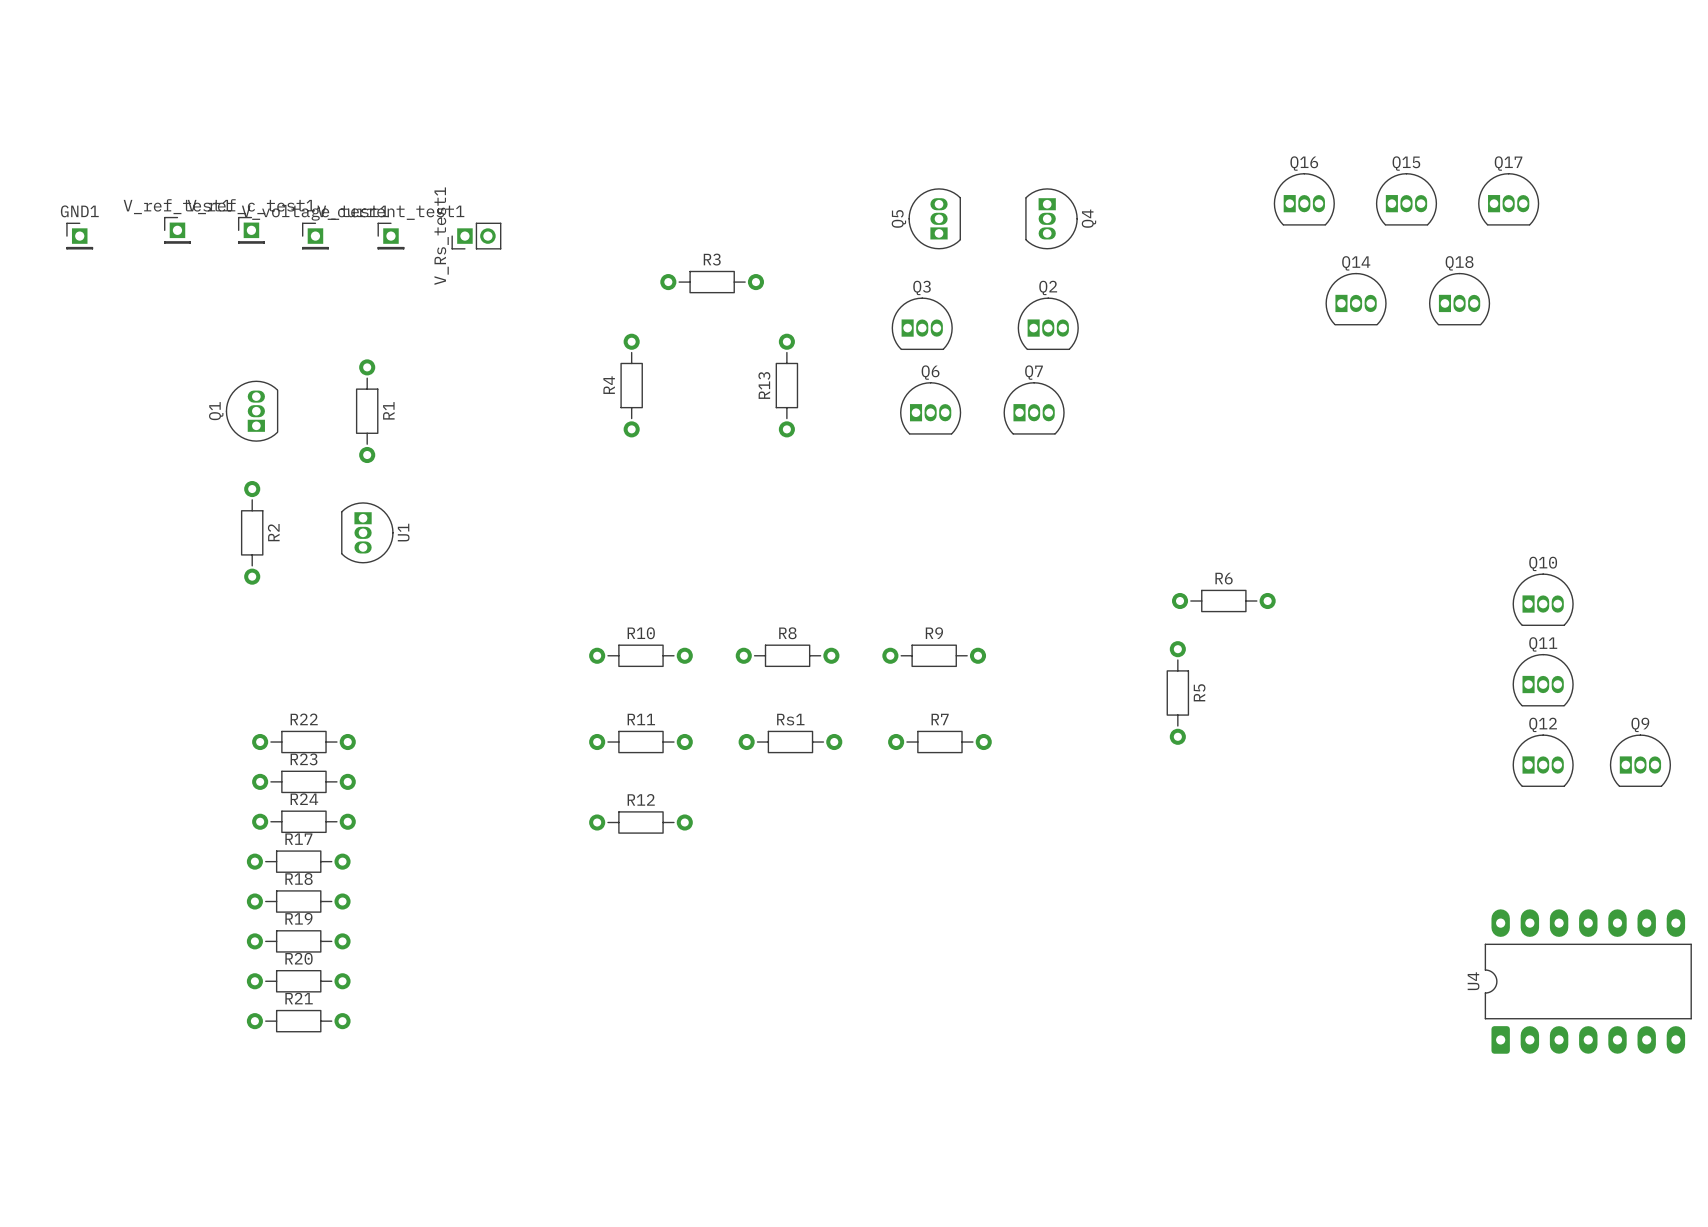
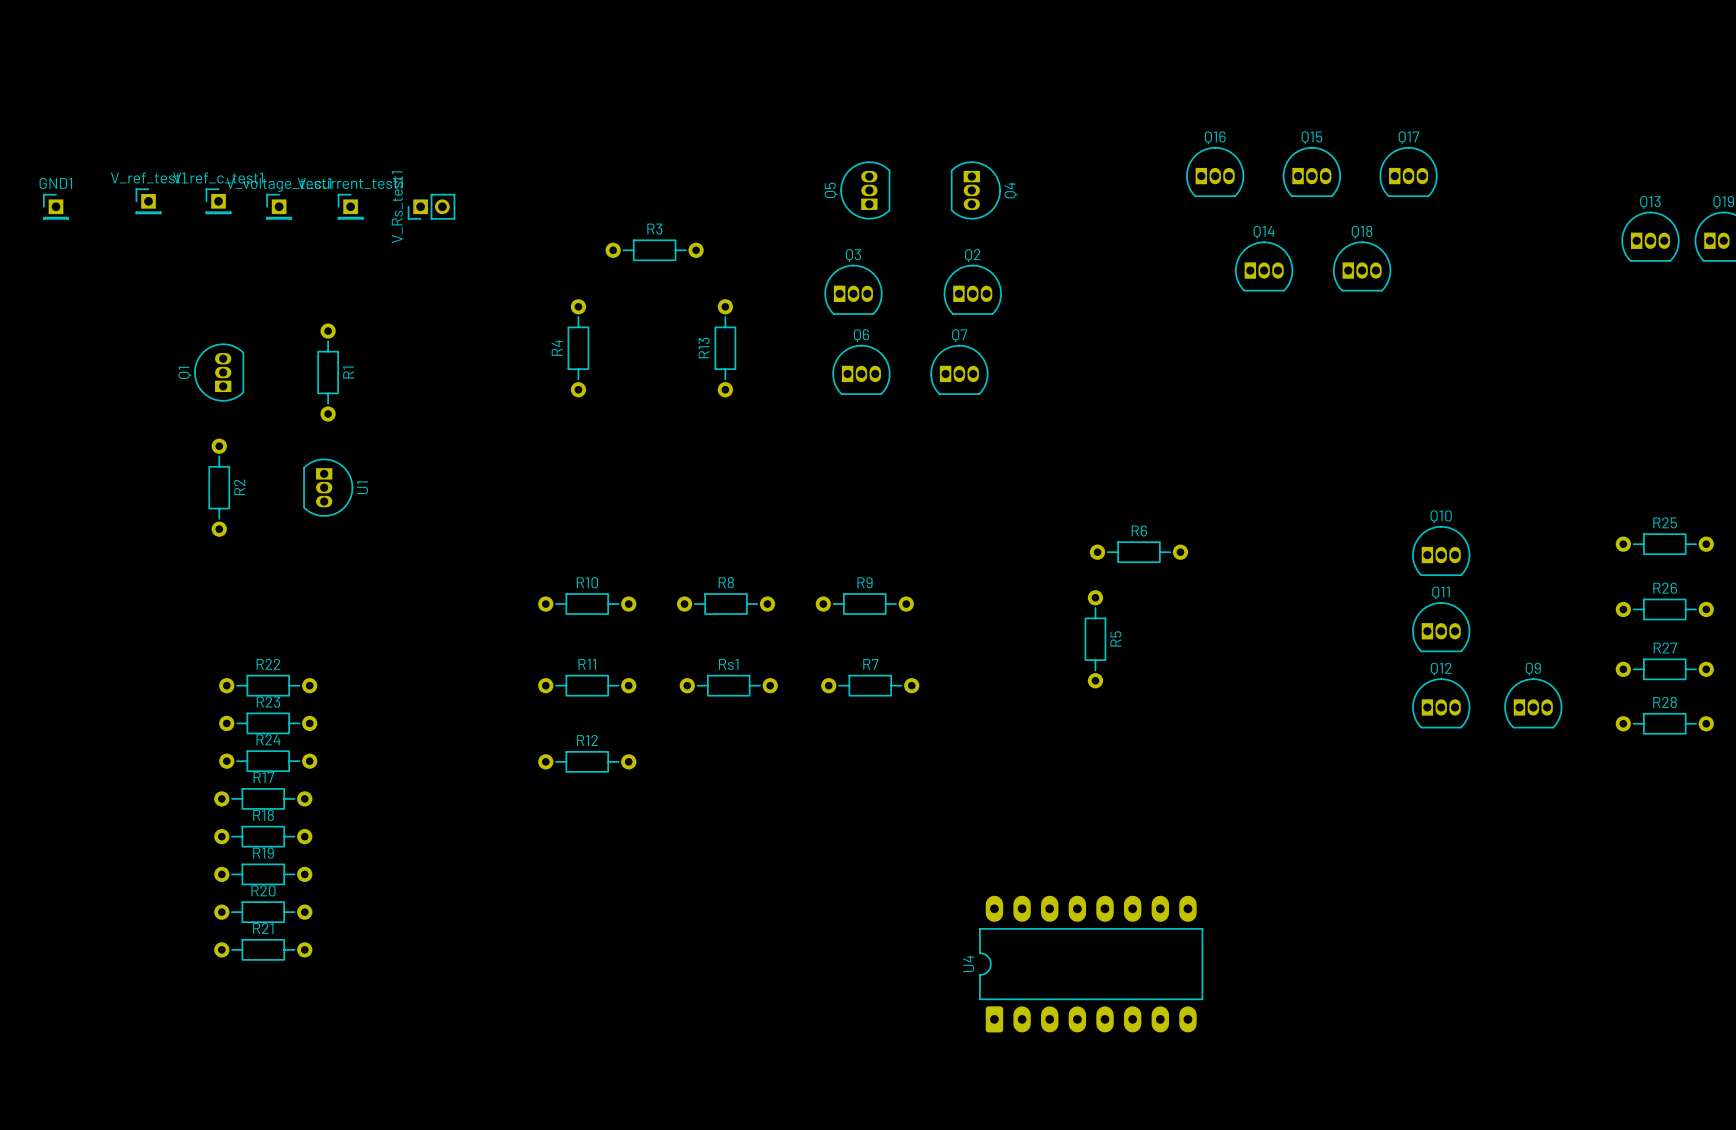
U4 footprint: [1484, 909, 1692, 1054] -> [979, 895, 1204, 1033]

